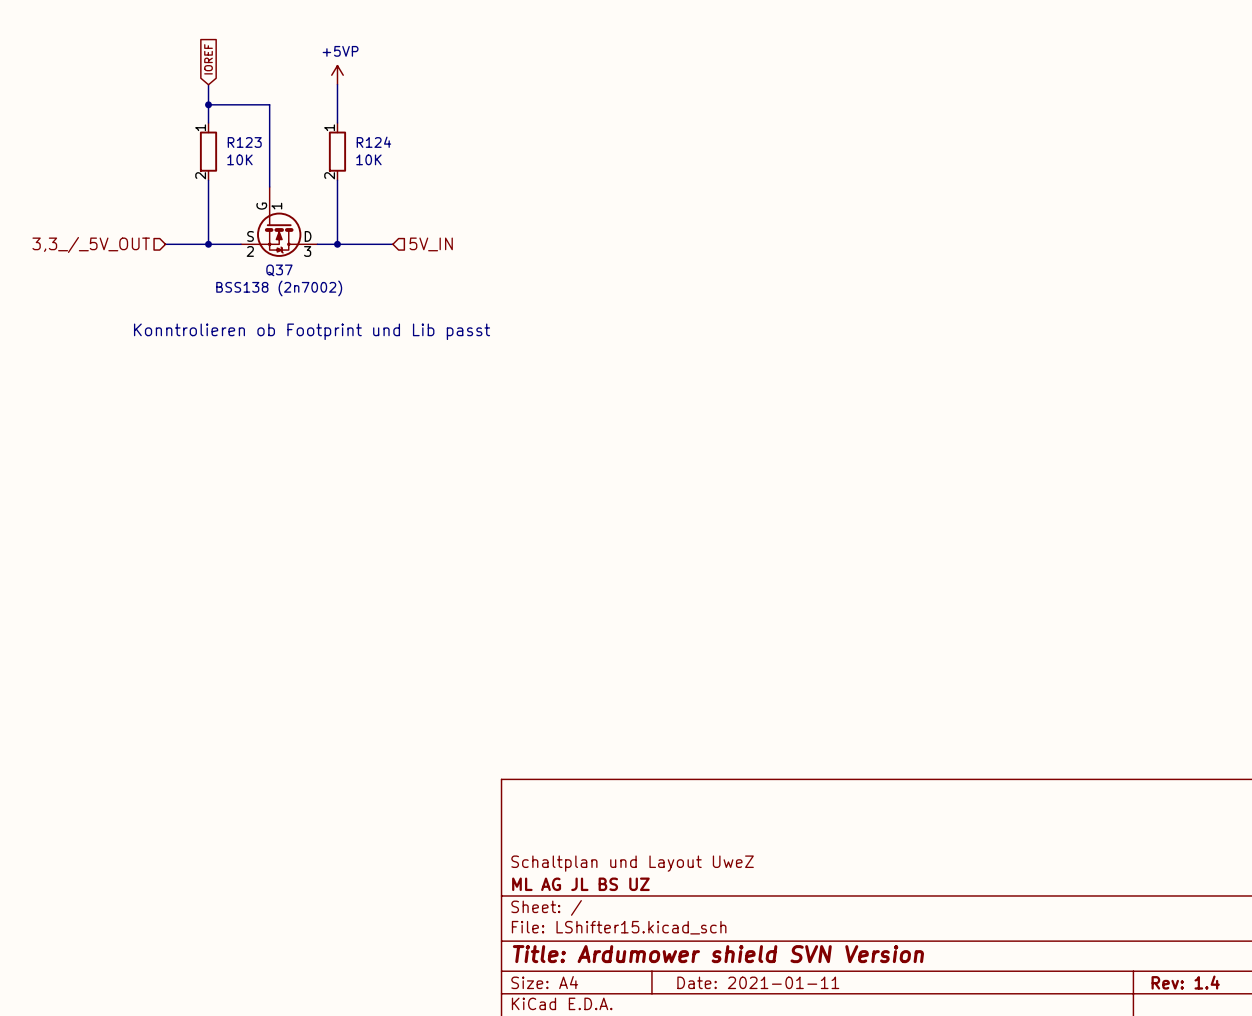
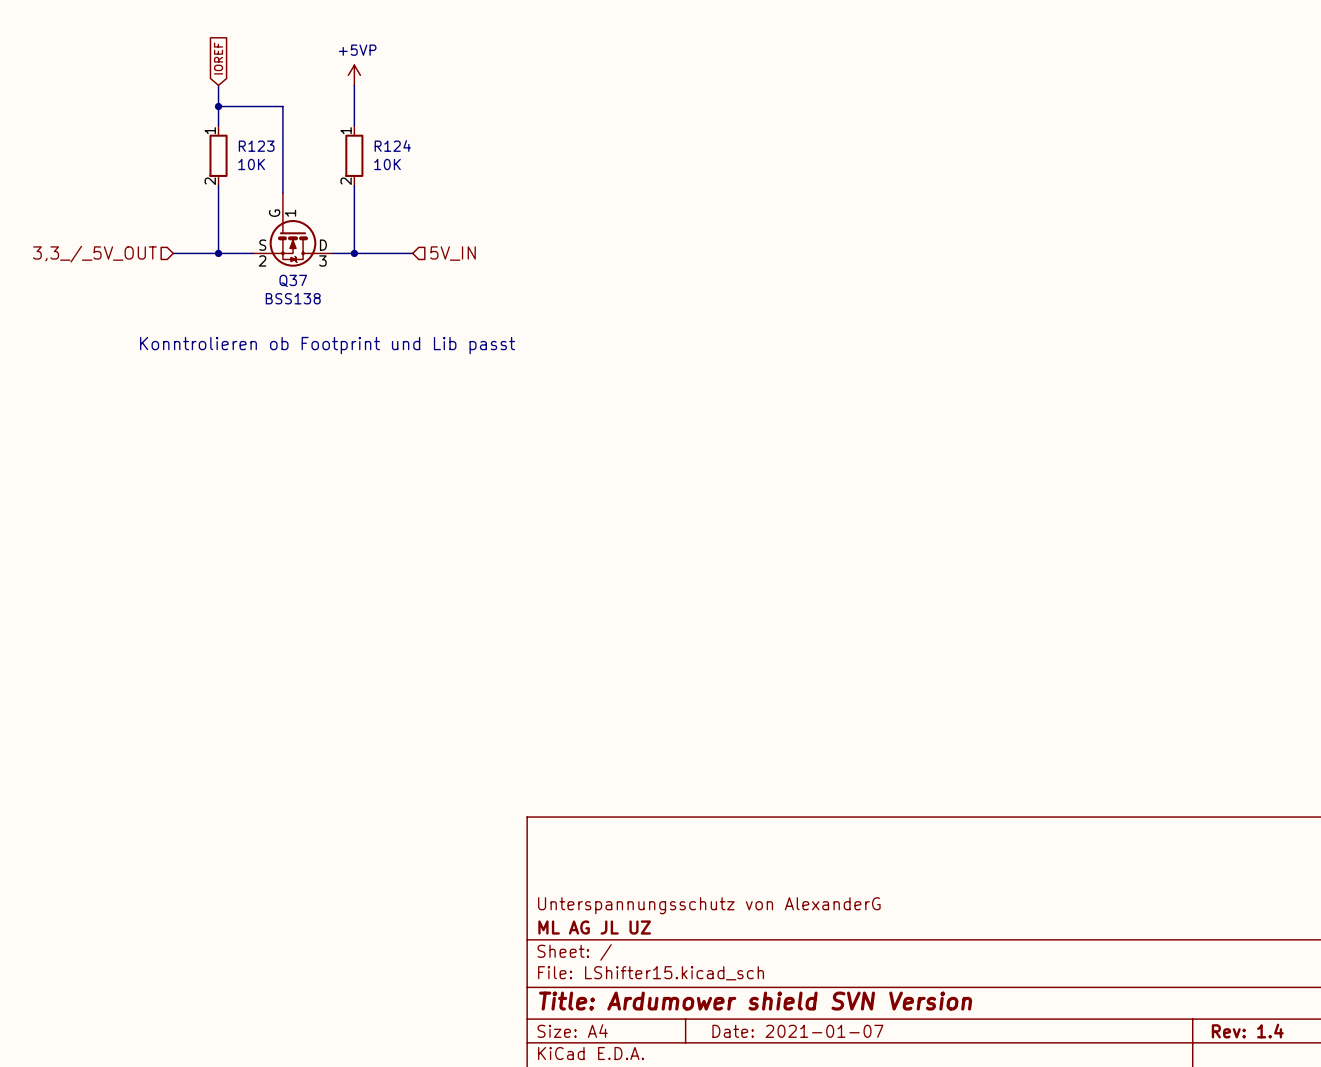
Q37 value: BSS138 (2n7002) (279, 288) -> BSS138 (293, 298)
title block: Schaltplan und Layout UweZ (632, 863) -> Unterspannungsschutz von AlexanderG (709, 905)
title block: ML AG JL BS UZ (580, 884) -> ML AG JL UZ (594, 927)
title block: Date: 2021-01-11 (758, 982) -> Date: 2021-01-07 (797, 1031)

